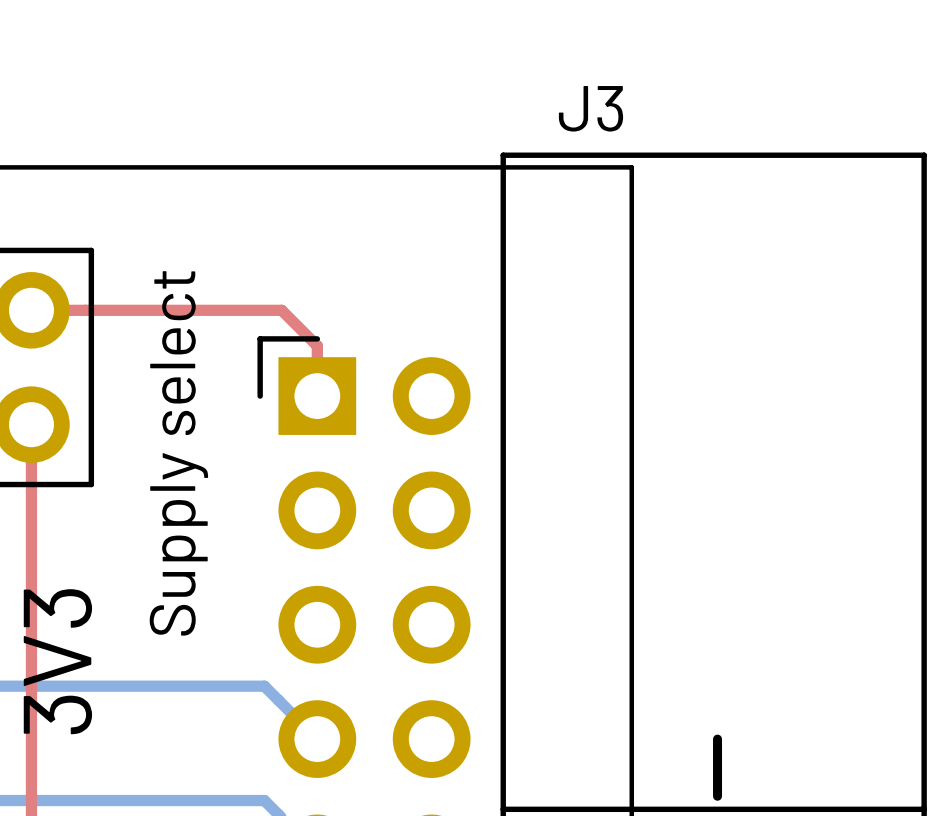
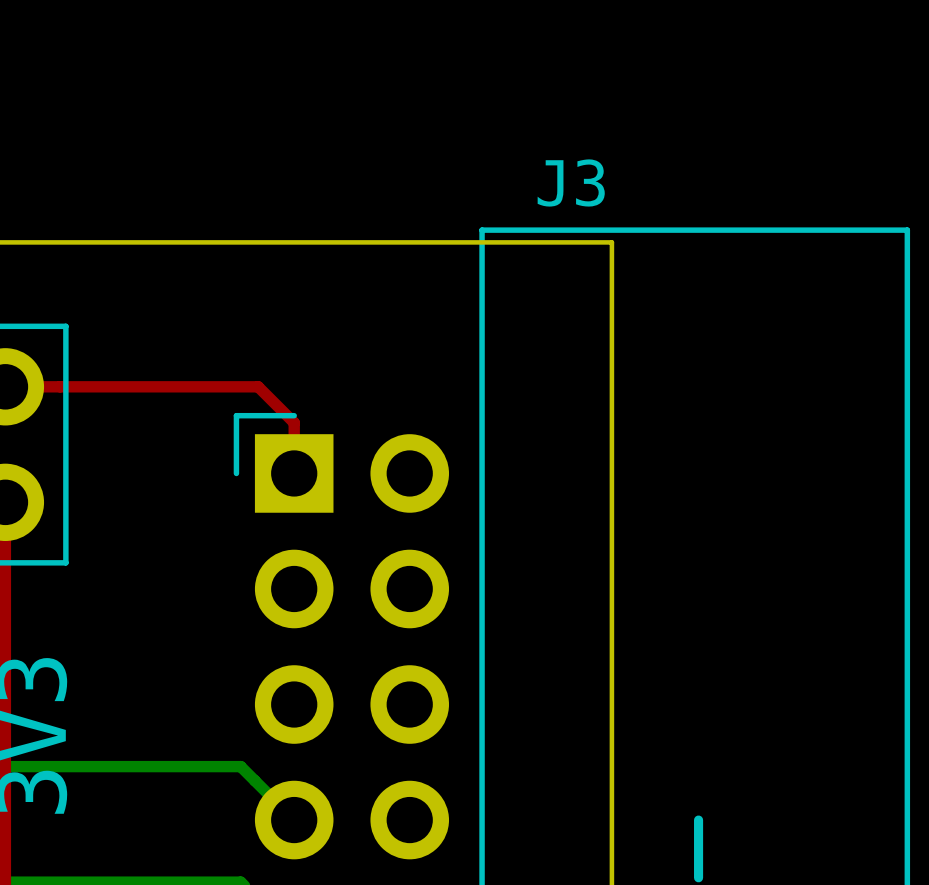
part value: Supply select (178, 453) -> none

